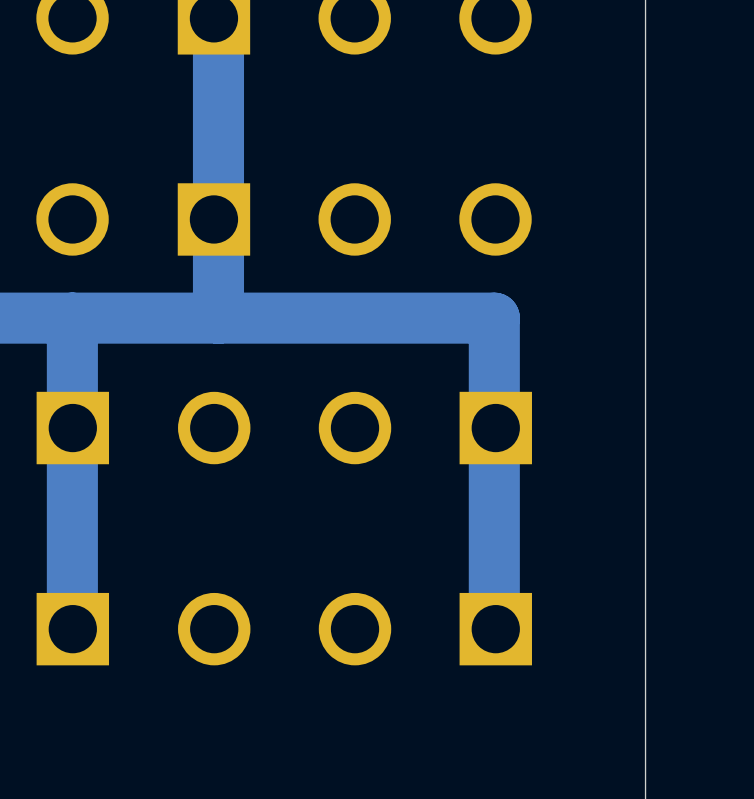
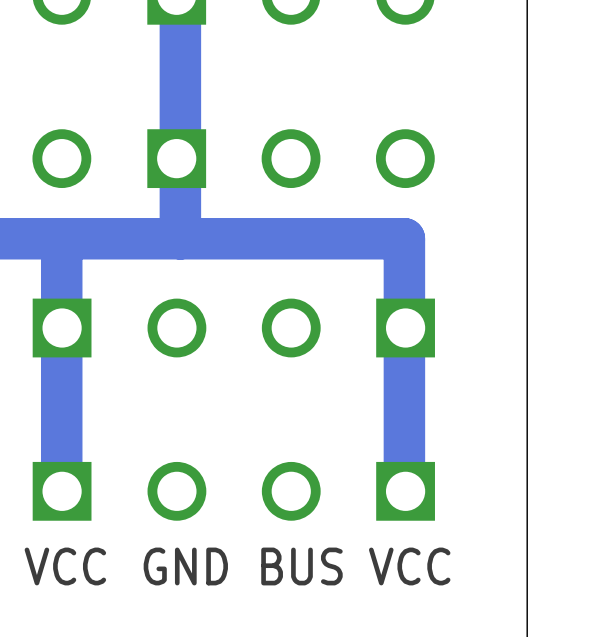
text: none -> VCC (65, 566)
text: none -> GND (185, 566)
text: none -> BUS (301, 566)
text: none -> VCC (409, 566)

